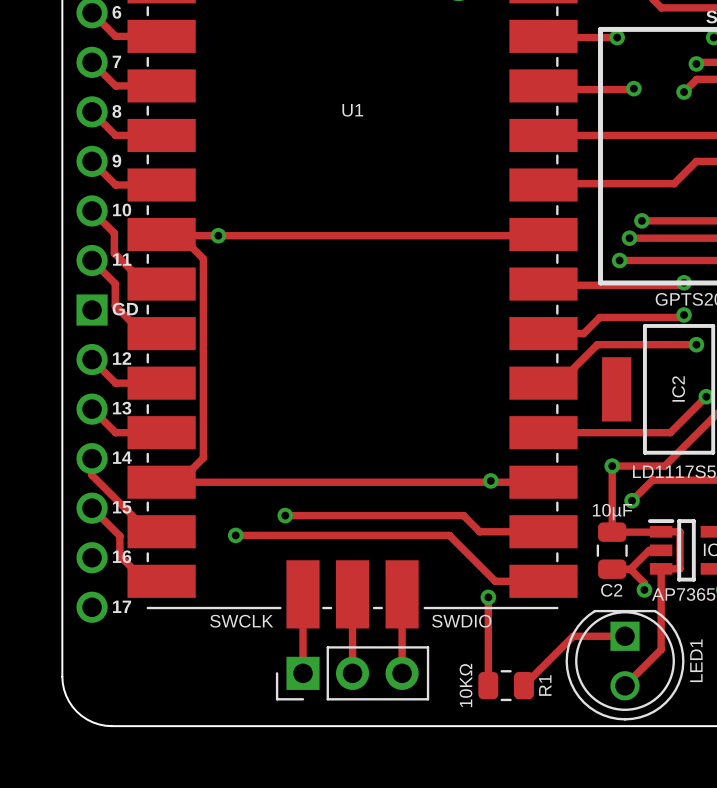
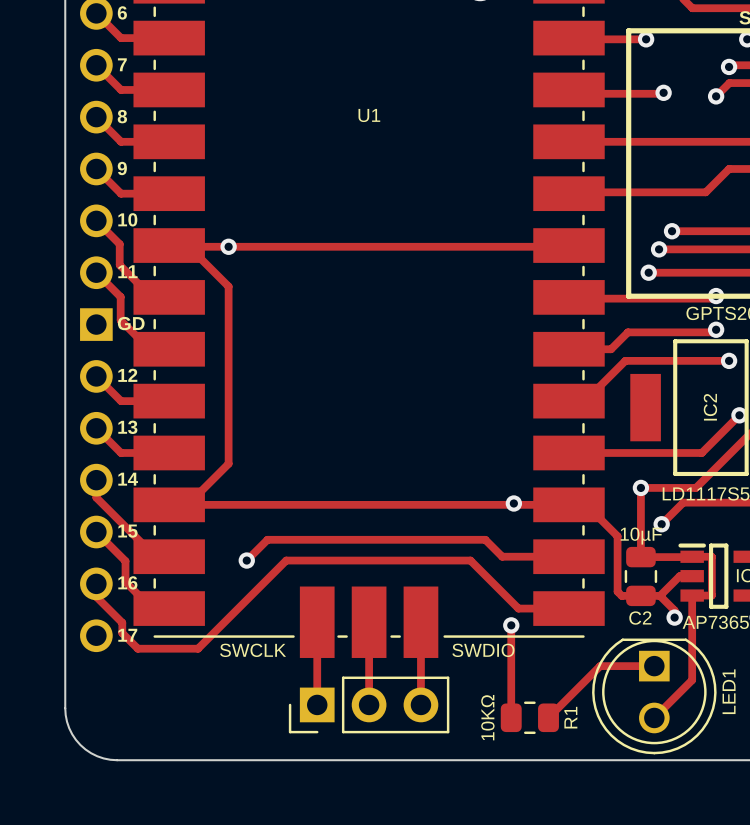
track: (203, 258) (203, 458) -> (212, 270) (228, 286) (228, 463) (212, 479)
track: none -> (586, 504) (617, 536) (617, 591) (621, 595) (640, 595)
track: none -> (298, 539) (267, 539) (244, 563)
via: (285, 515) -> none
track: (235, 535) (273, 535) -> (96, 583) (96, 596) (122, 622) (122, 633) (137, 648) (198, 648) (286, 560)

